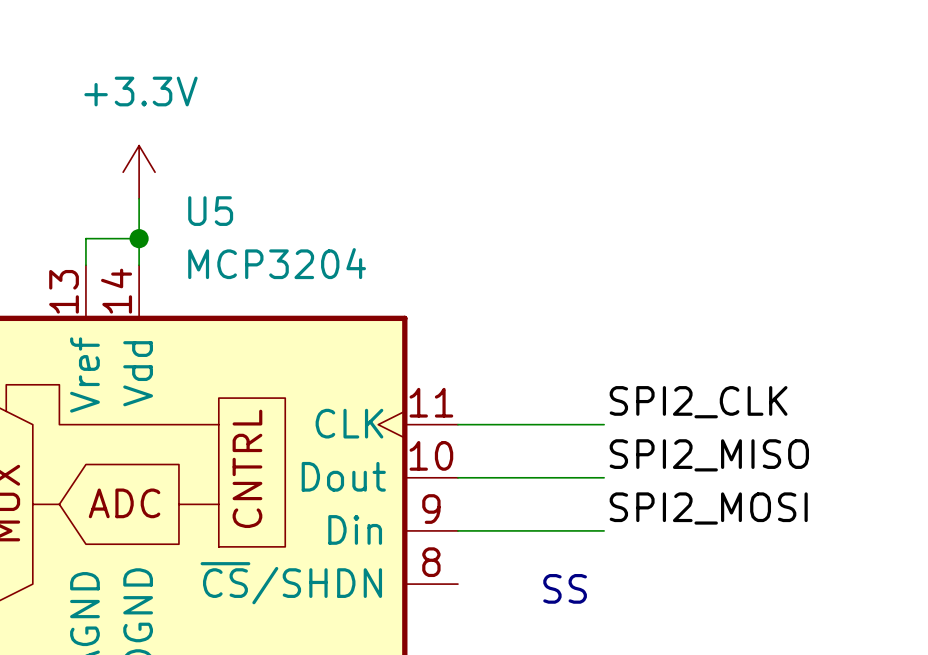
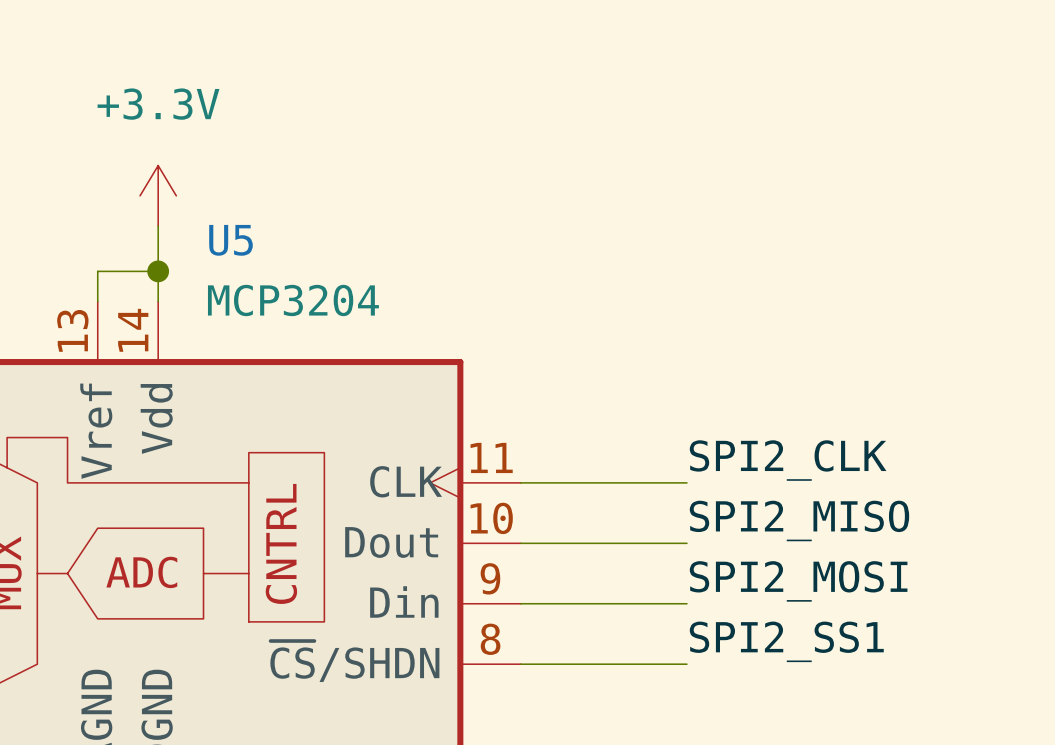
label: none -> SPI2_SS1 (786, 641)
wire: none -> (520, 664) (686, 664)
text: SS (565, 588) -> none

